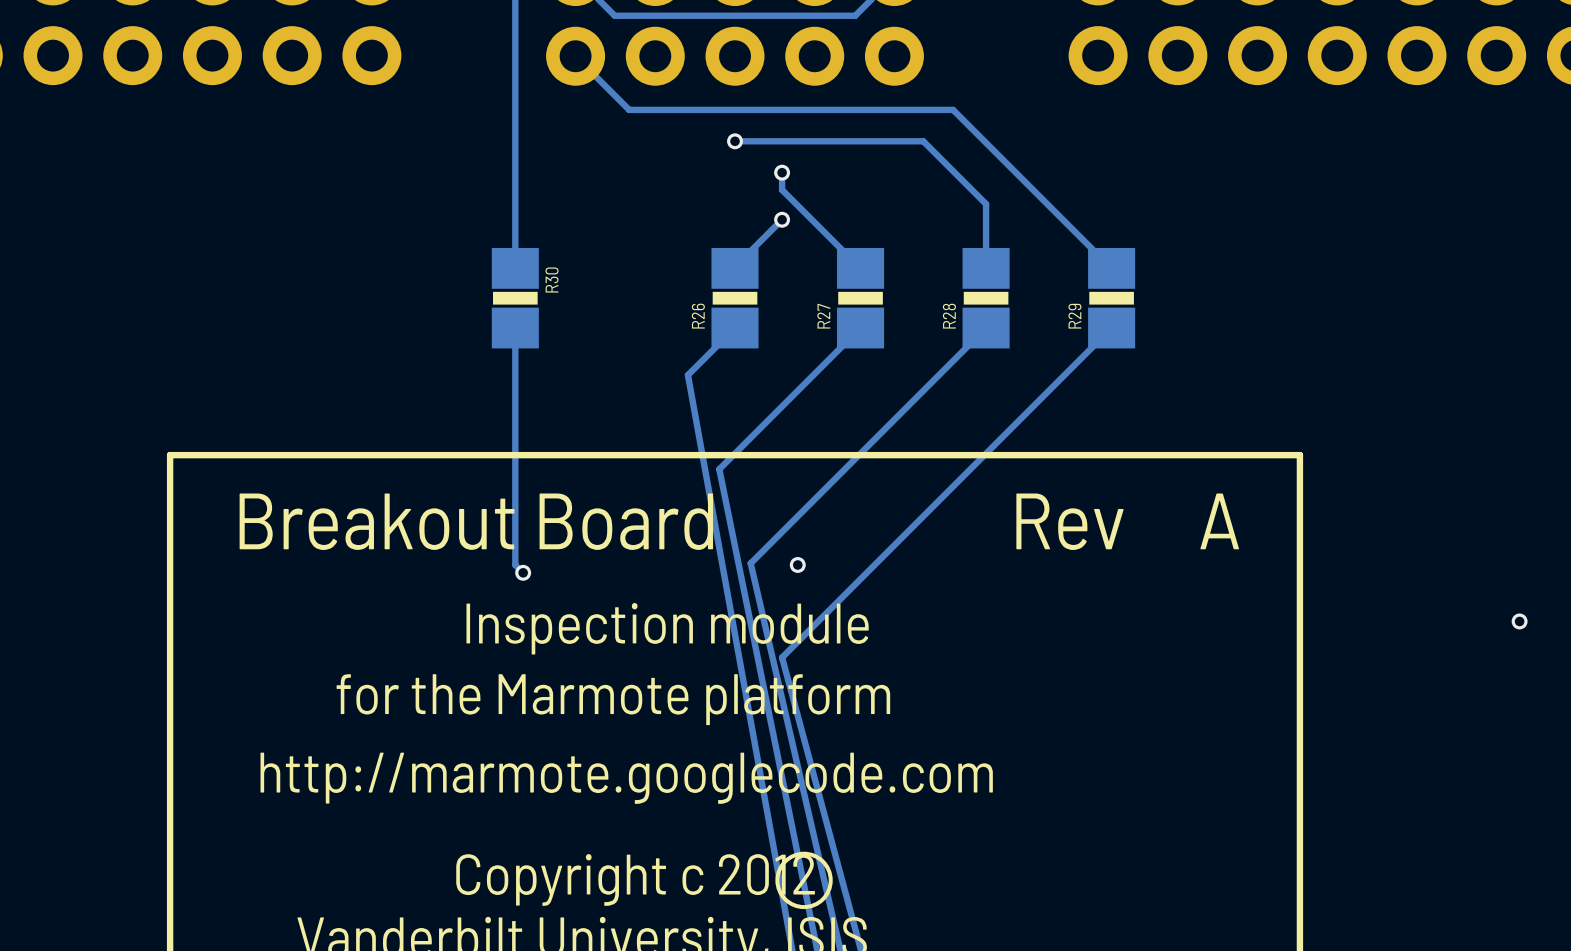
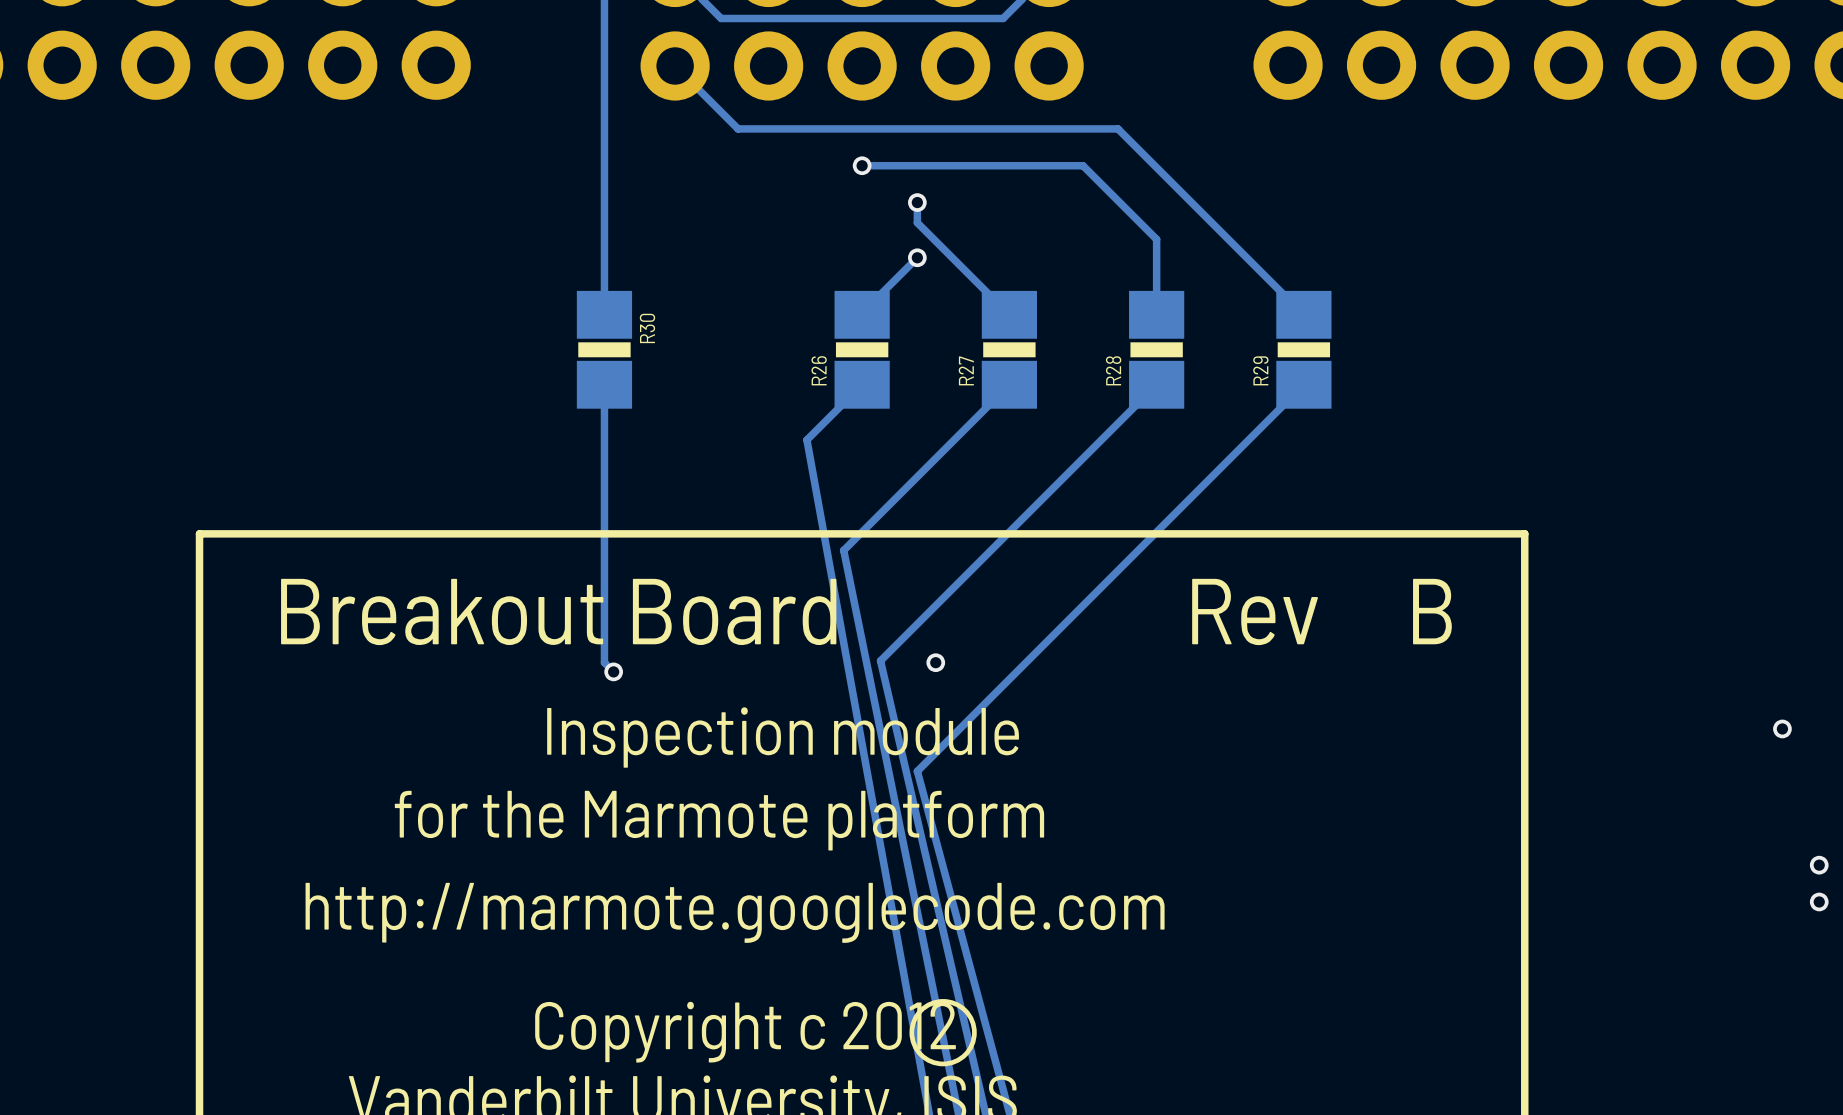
text: A (1219, 521) -> B (1432, 611)
via: none -> (1819, 865)
via: none -> (1819, 901)

